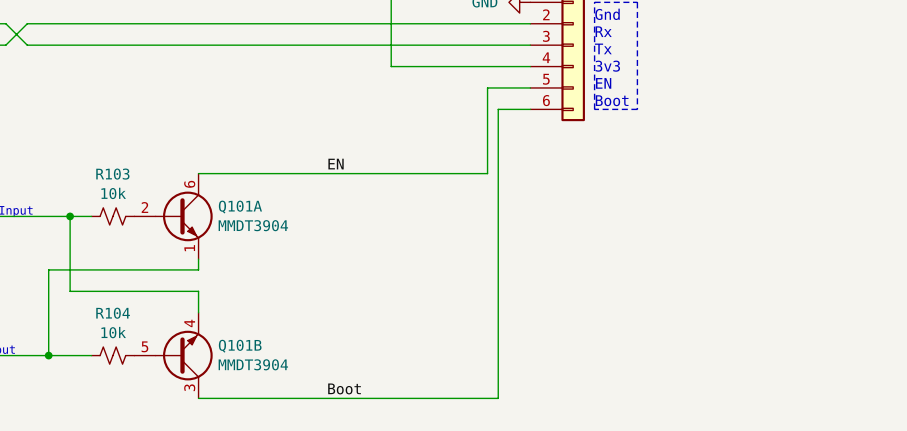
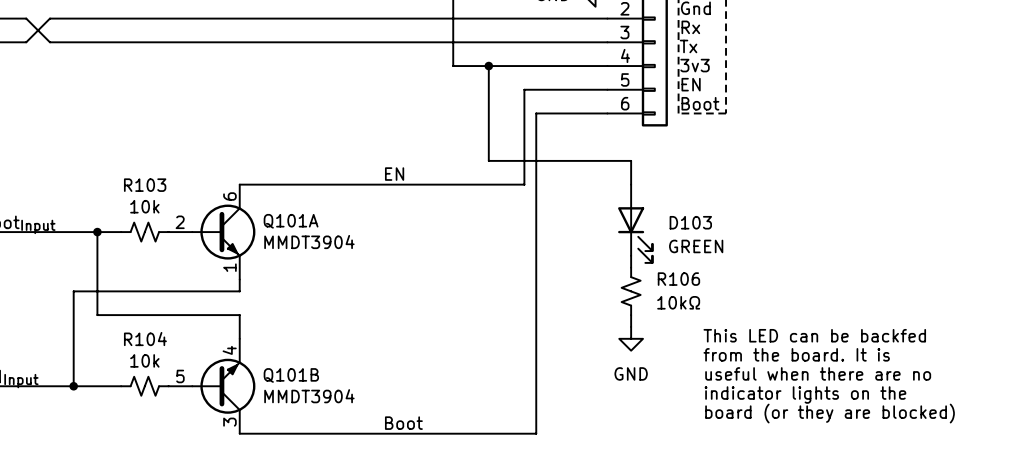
wire: none -> (488, 66) (488, 160) (631, 160) (631, 184)
junction: none -> (488, 66)
wire: (487, 87) (487, 173) (455, 173) -> (559, 89) (524, 89) (524, 184)
wire: (498, 109) (498, 398) (466, 398) -> (571, 113) (536, 113) (536, 433)
D103: none -> GREEN (635, 223)
wire: none -> (631, 255) (631, 267)
R106: none -> 10kΩ (631, 291)
wire: none -> (631, 315) (631, 326)
text: none -> This LED can be backfed (814, 335)
power symbol: none -> GND (631, 338)
text: none -> from the board. It is (796, 354)
text: none -> useful when there are no (818, 373)
text: none -> indicator lights on the (805, 395)
text: none -> board (or they are blocked) (830, 413)

